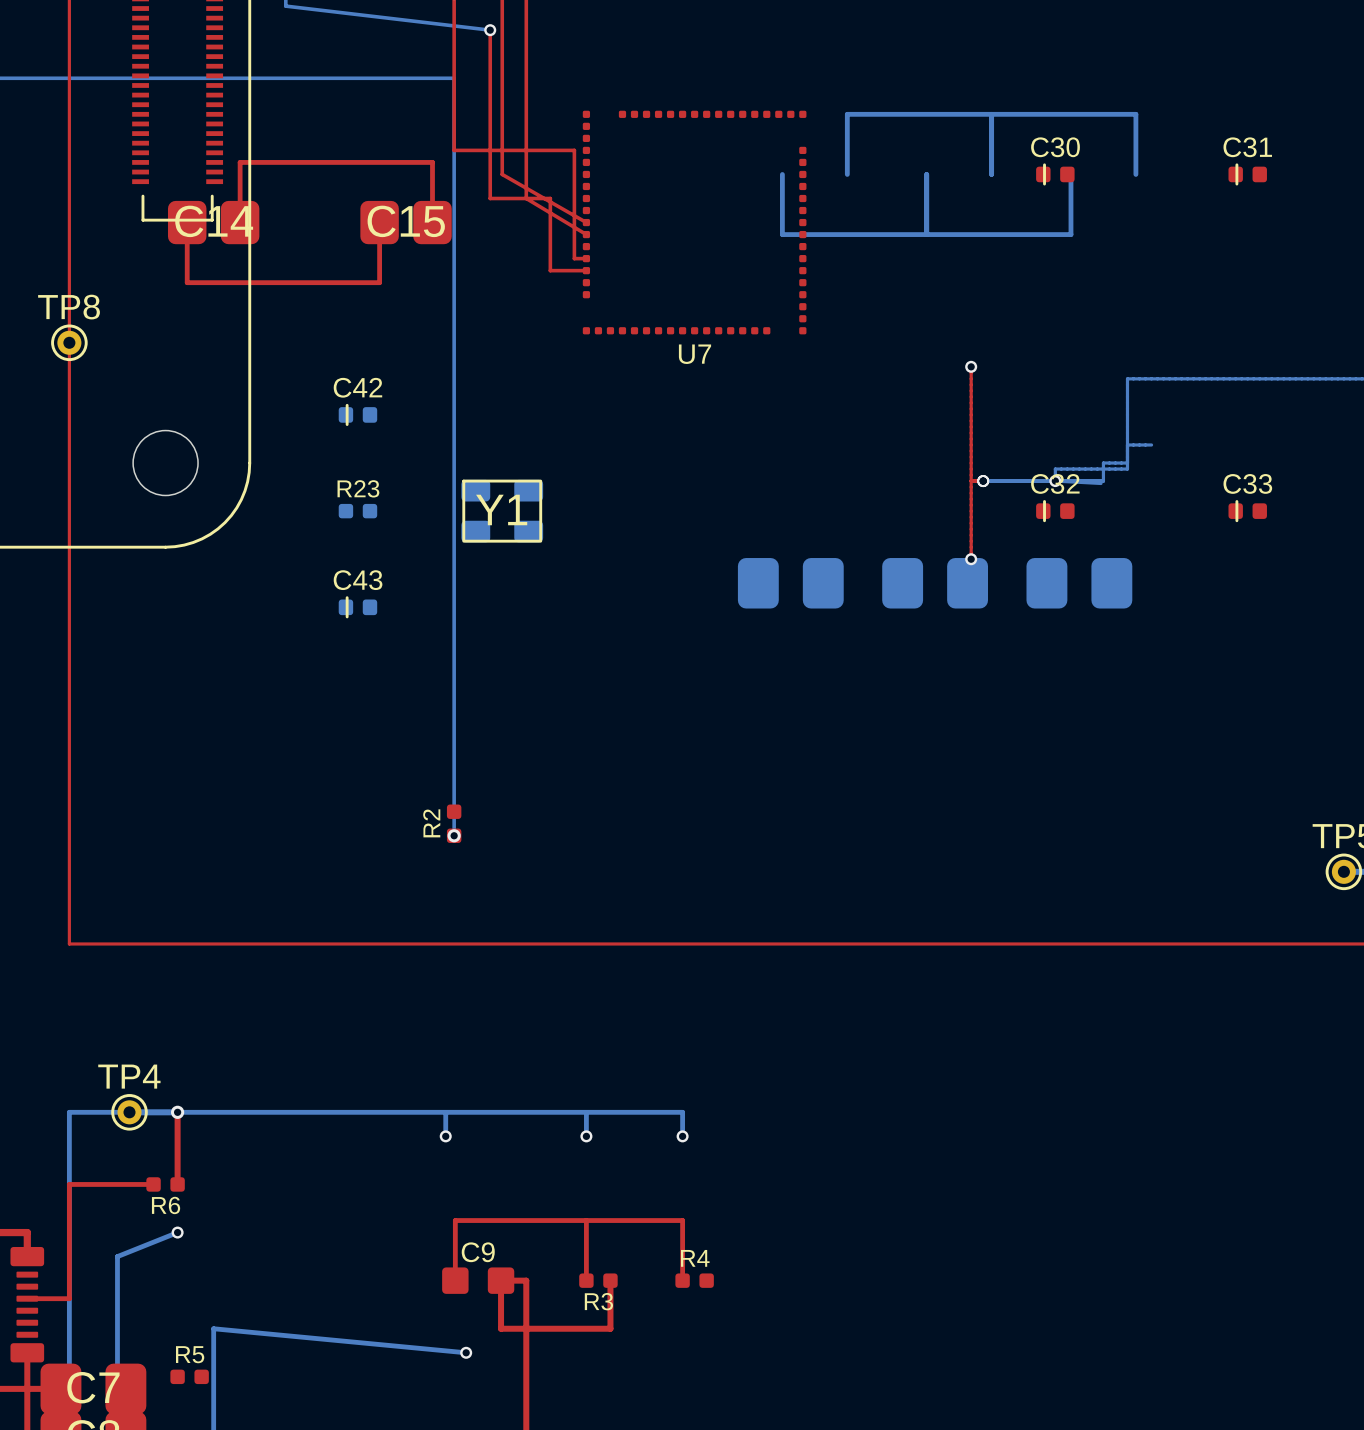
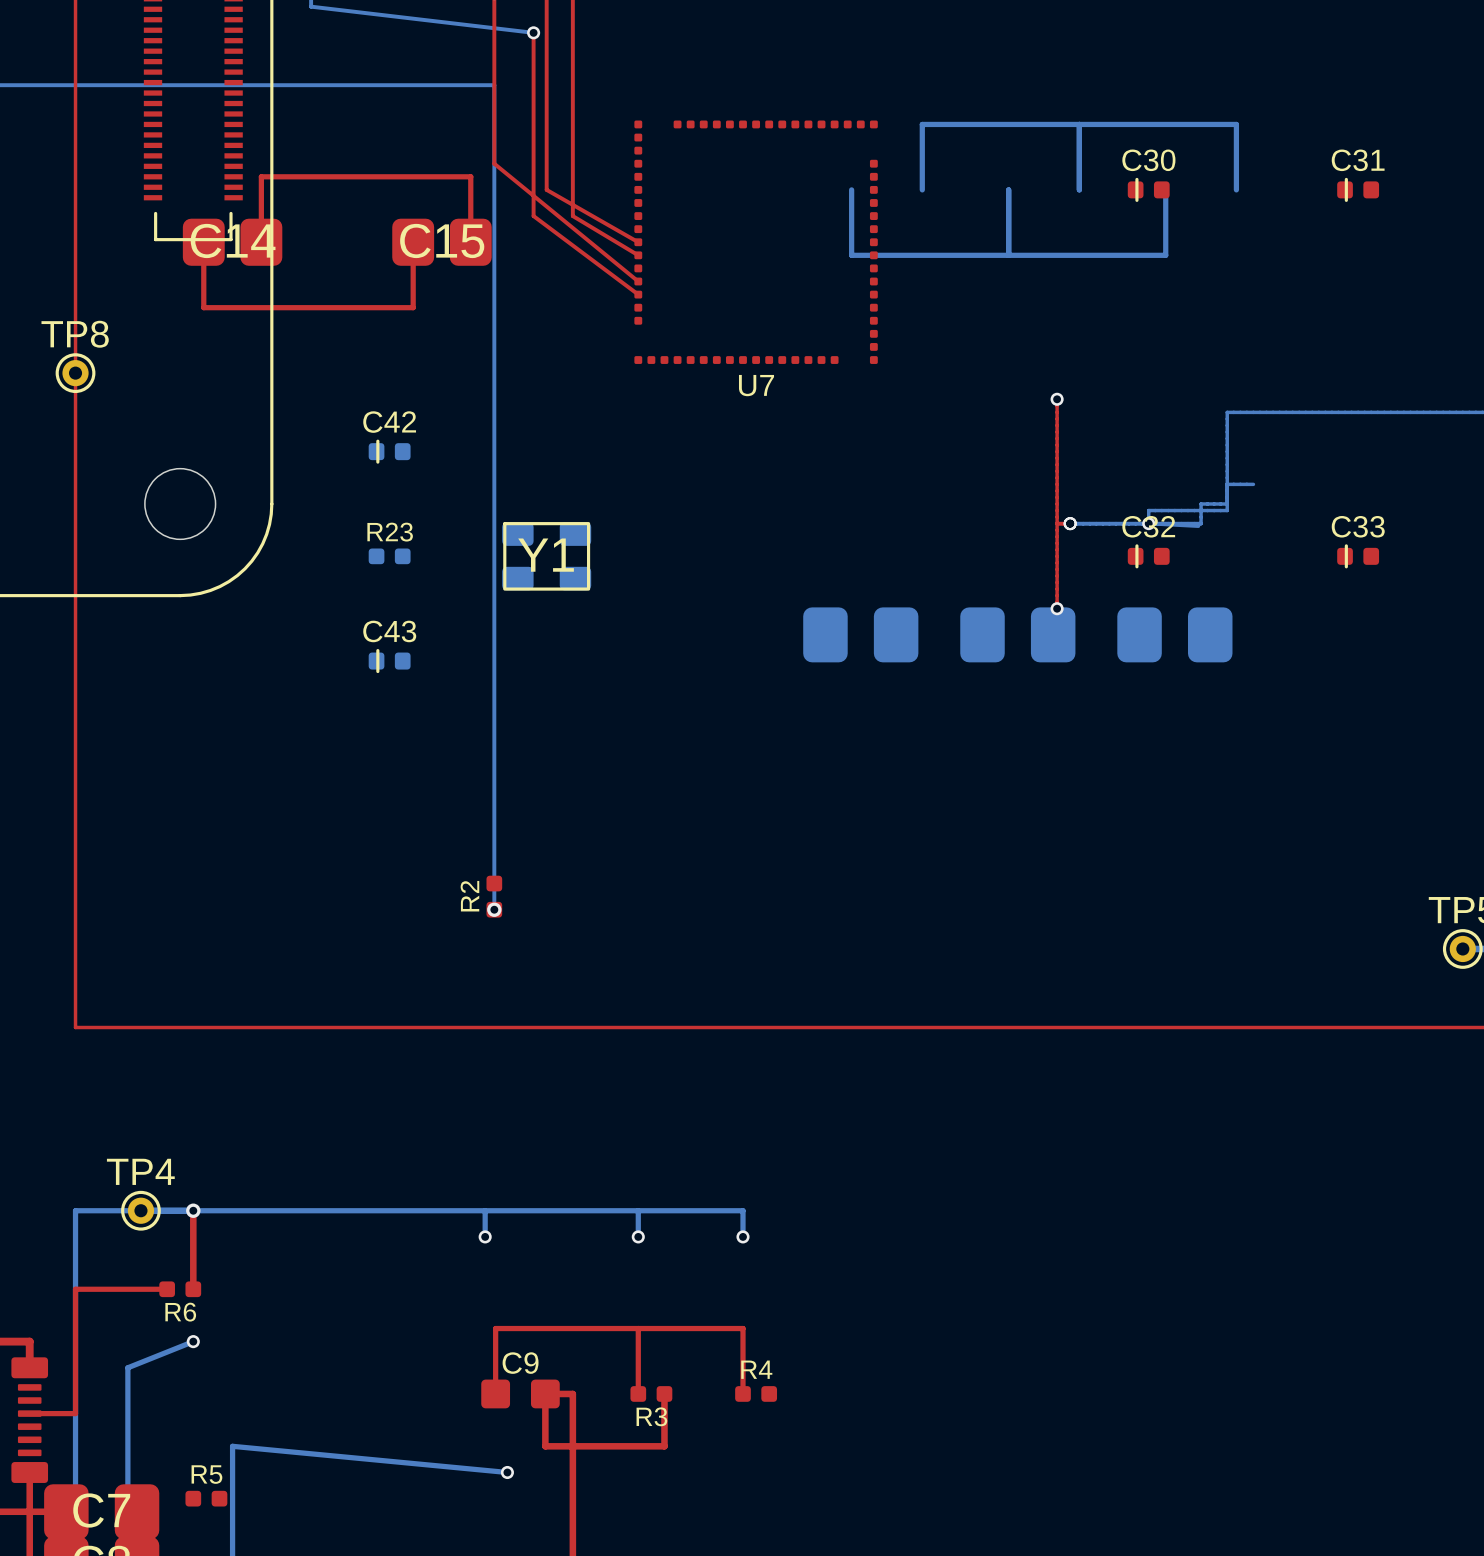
top track: (454, 150) (574, 150) (574, 258) (586, 258) -> (494, 163) (638, 281)
top track: (490, 198) (550, 198) (550, 270) (586, 270) -> (533, 216) (638, 294)

